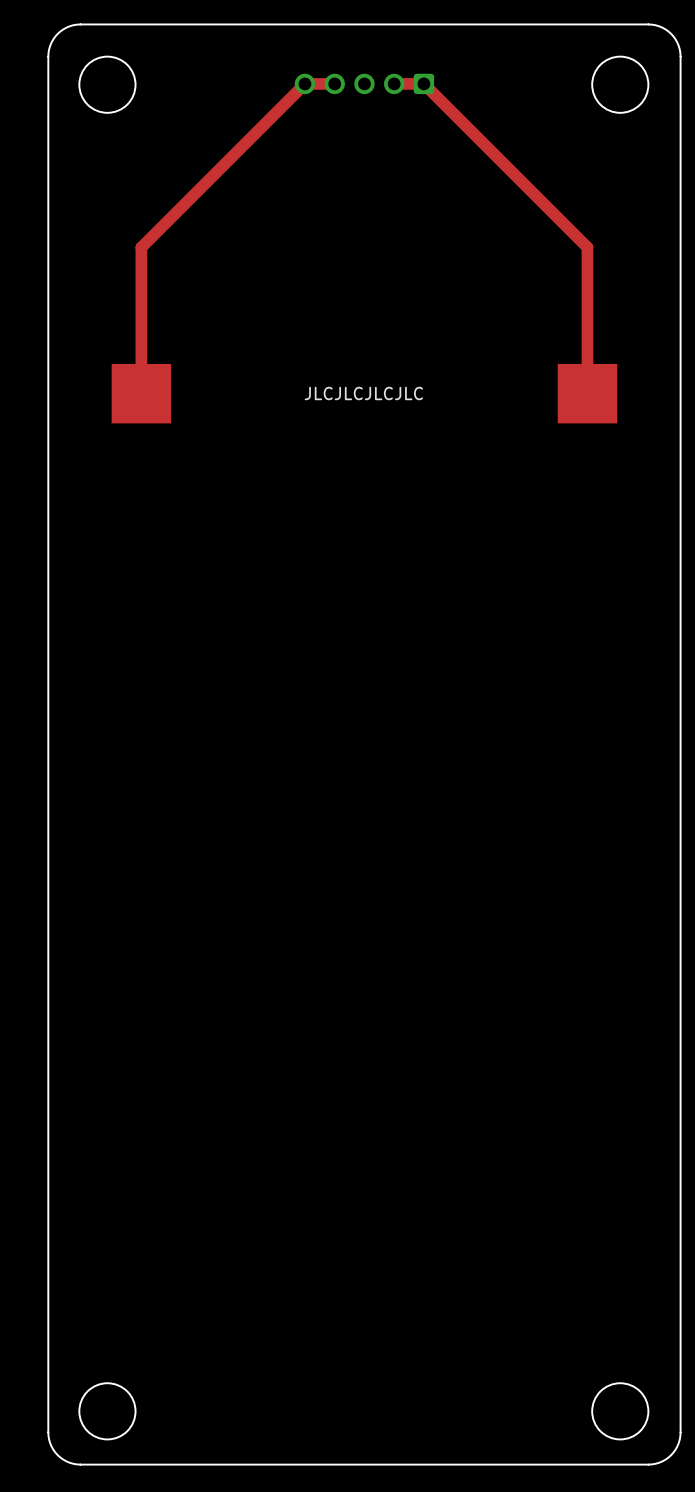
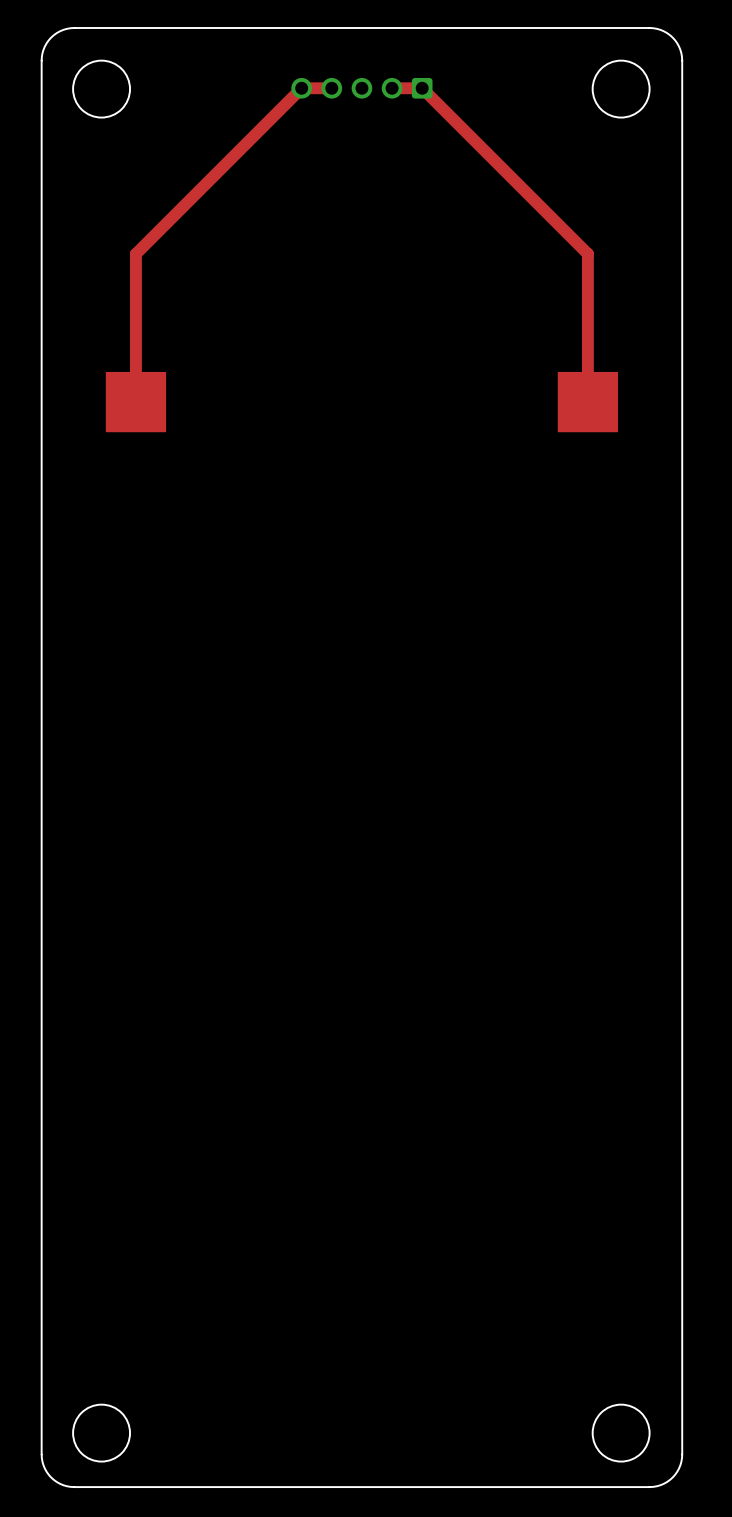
text: JLCJLCJLCJLC (363, 393) -> none

